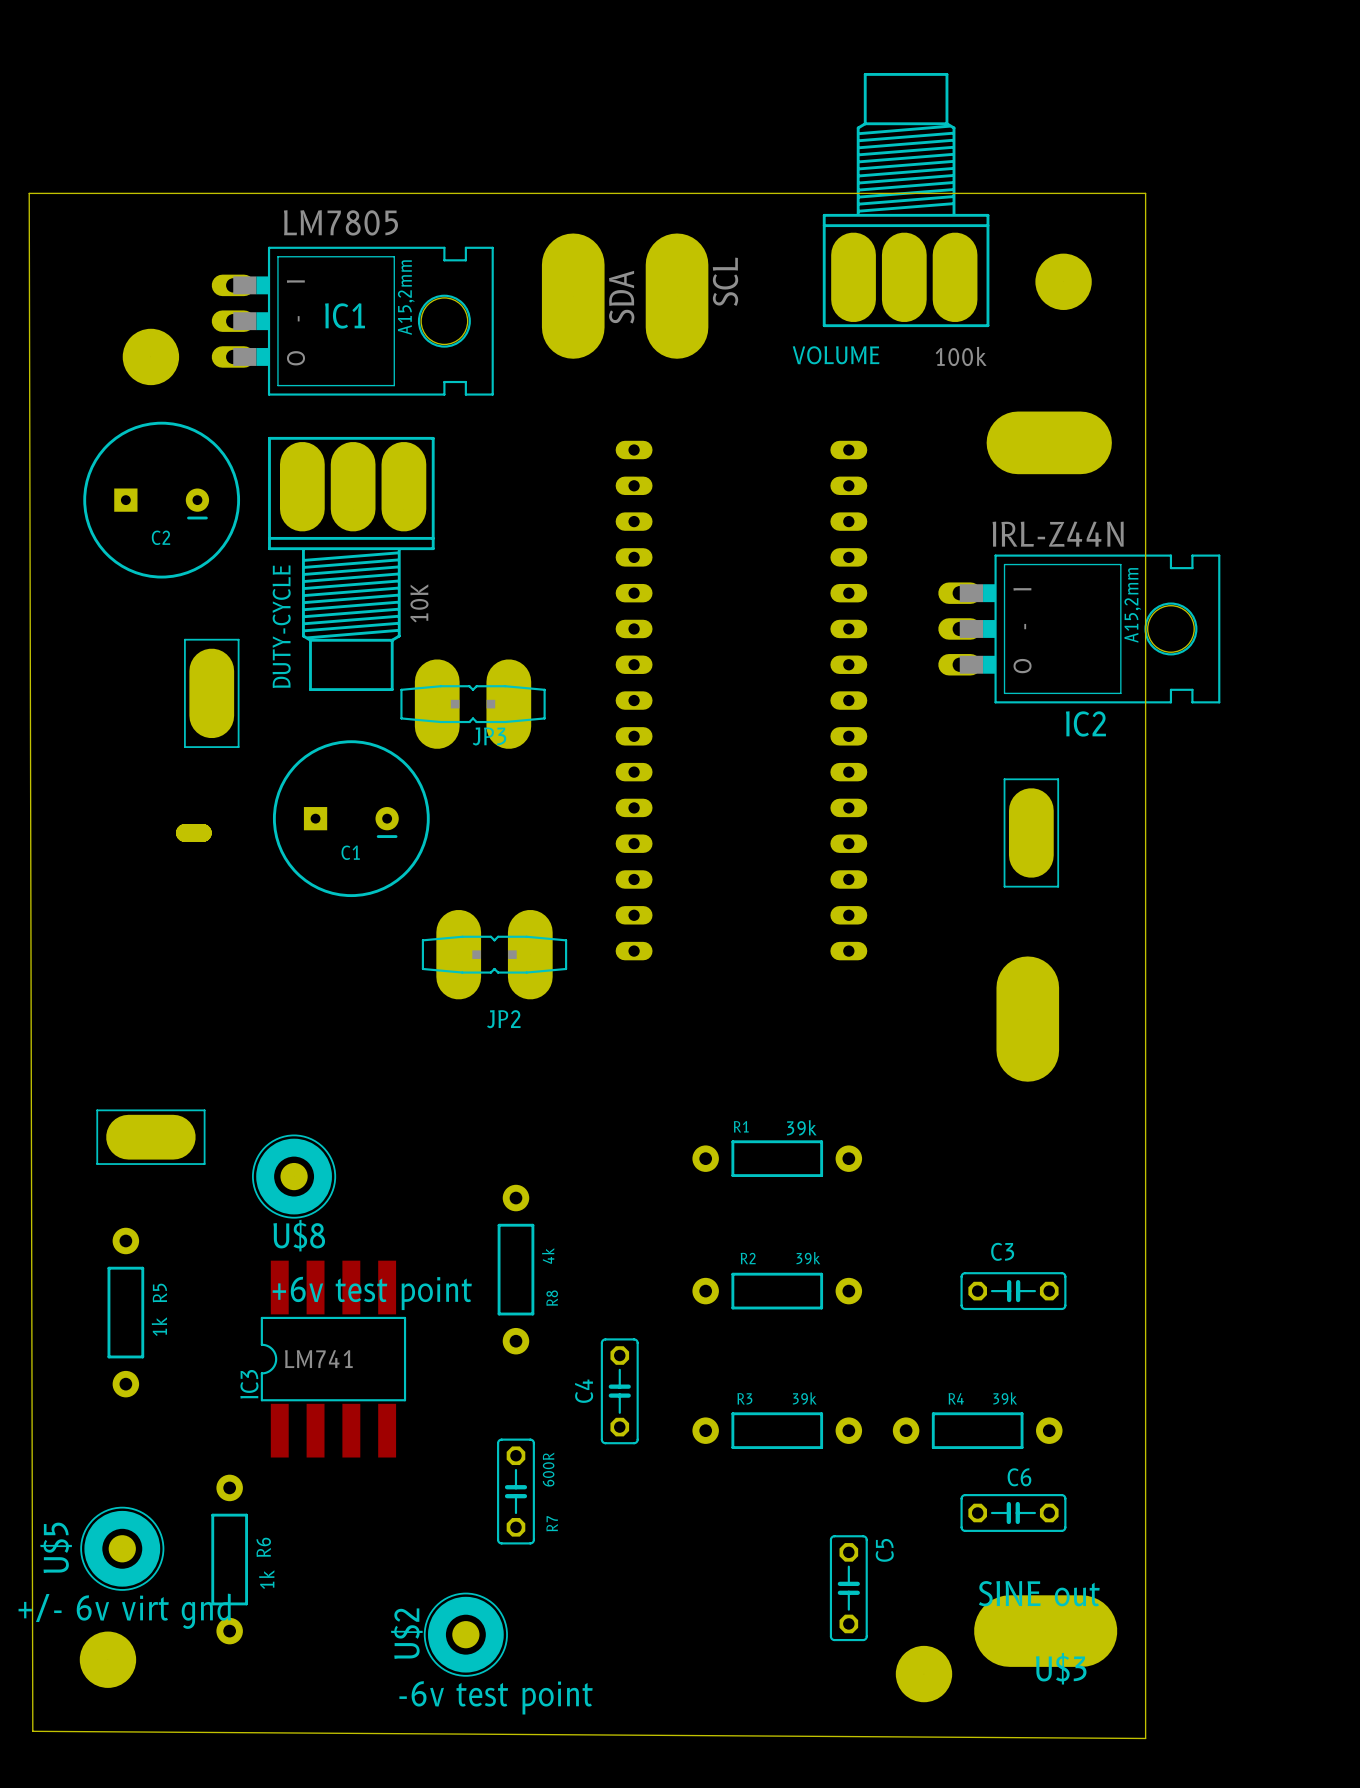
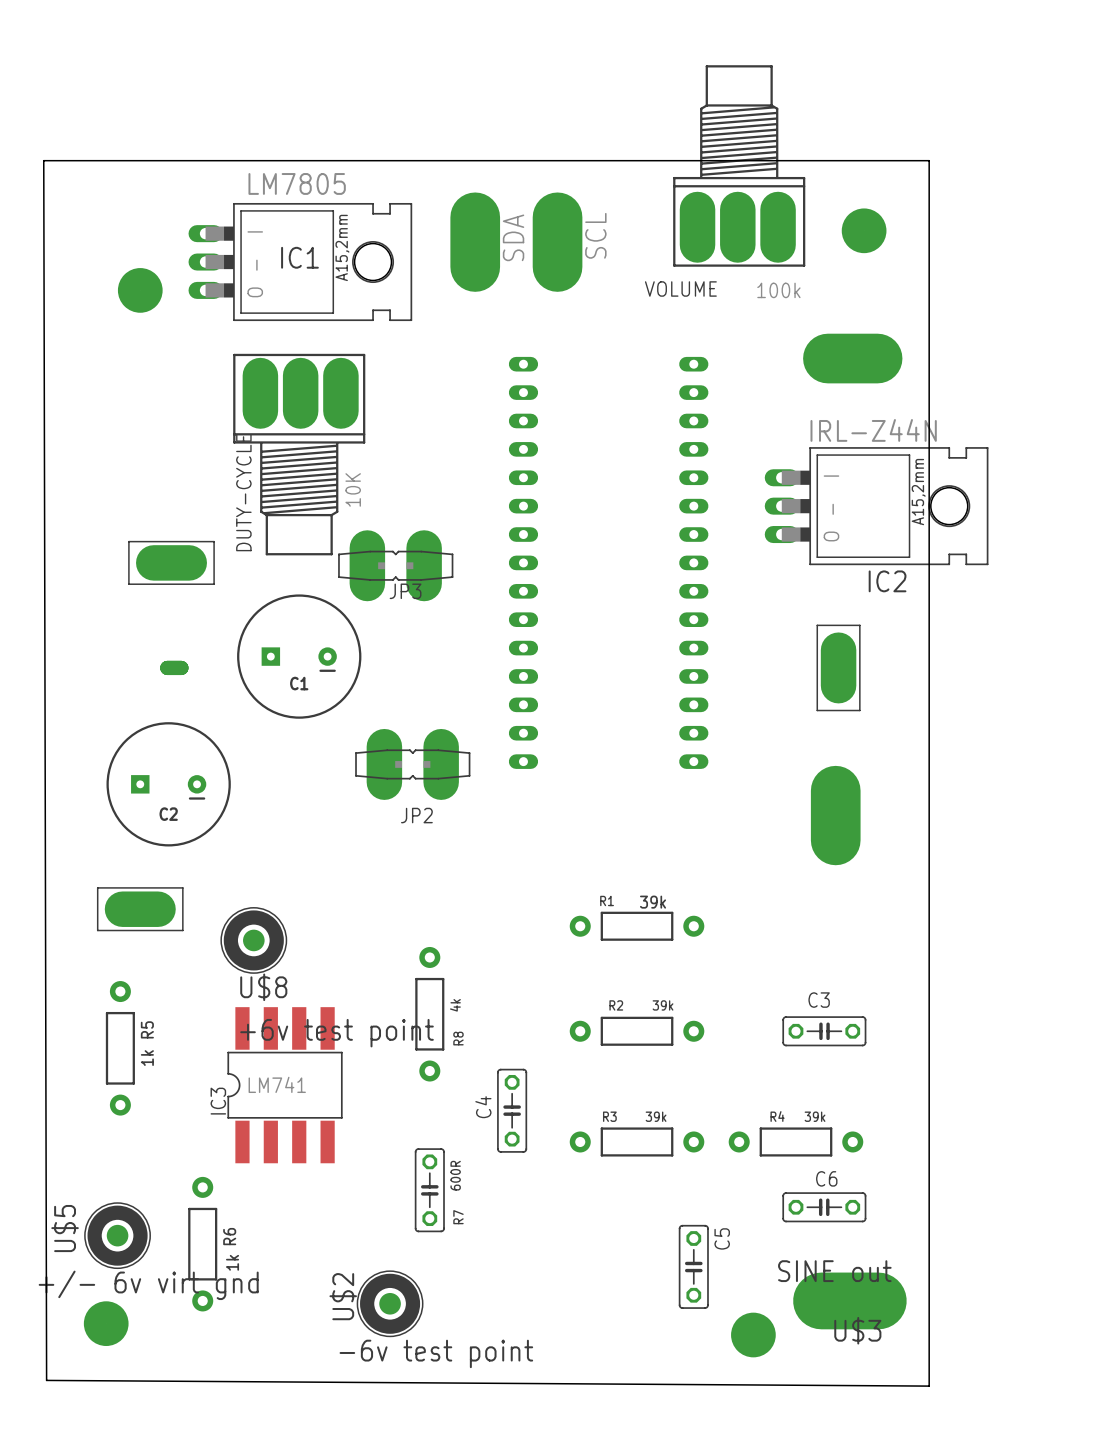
C2 position: (161, 500) -> (168, 784)
part rotation: 0° (211, 693) -> 90° clockwise (171, 562)

